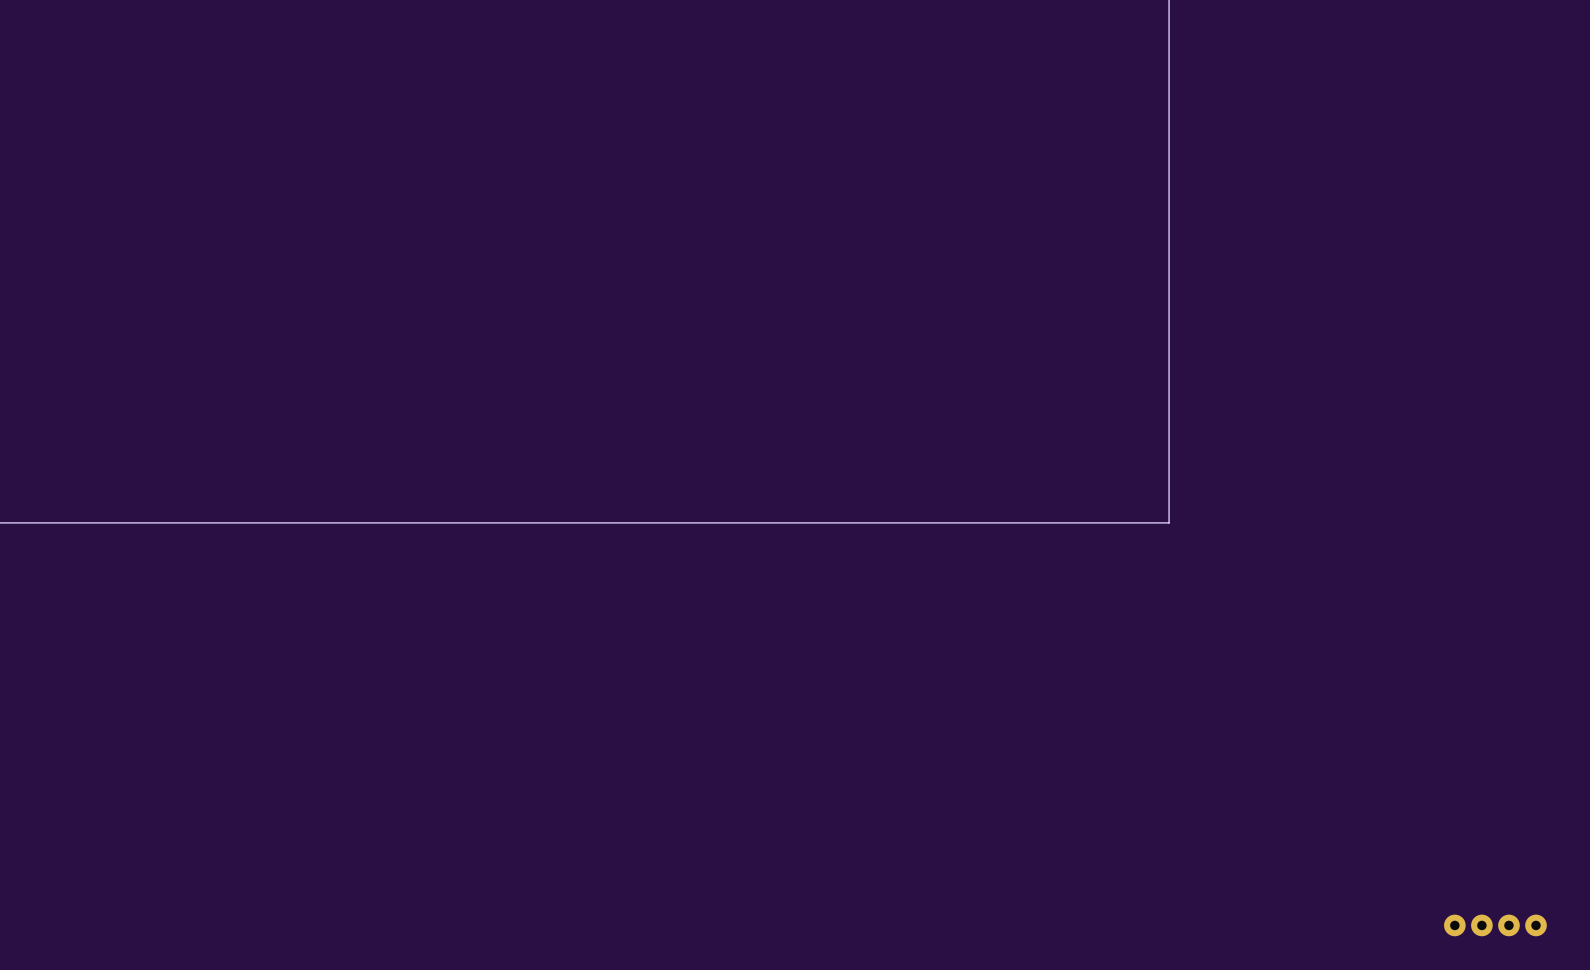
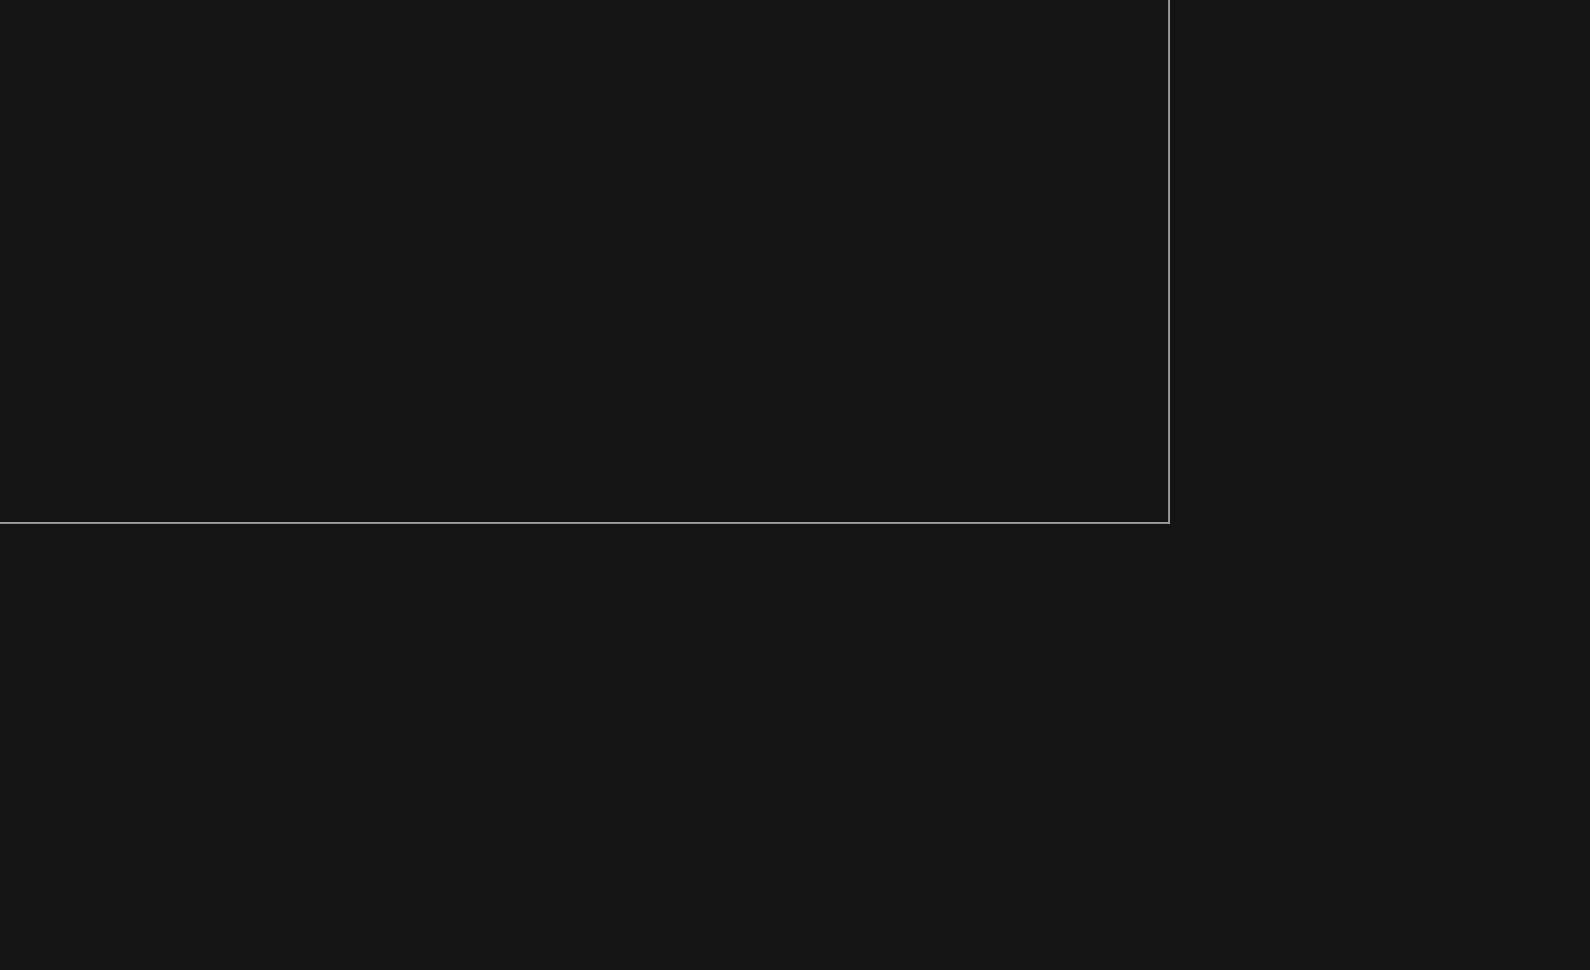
part: (1495, 925) -> none

